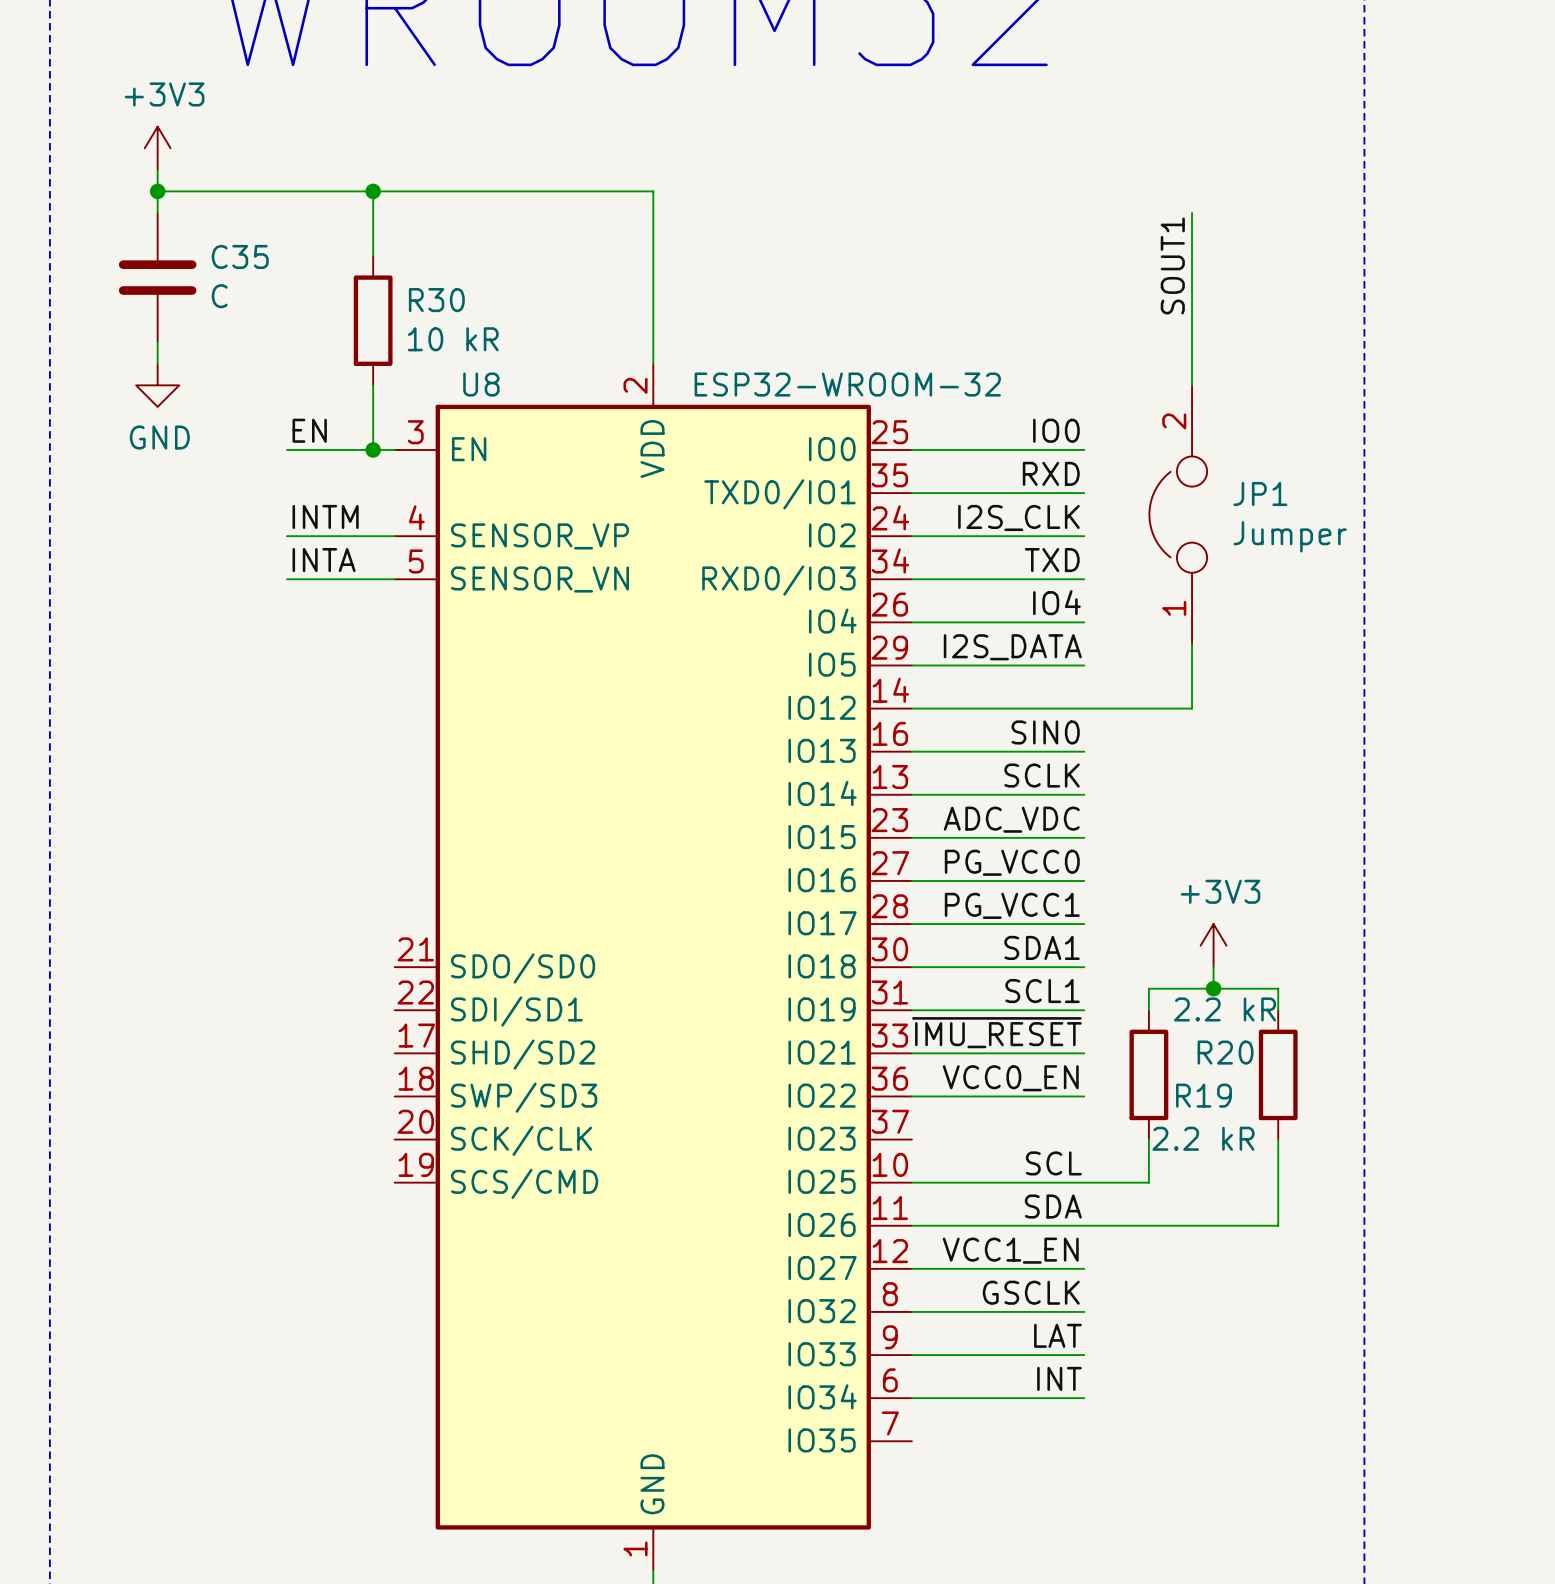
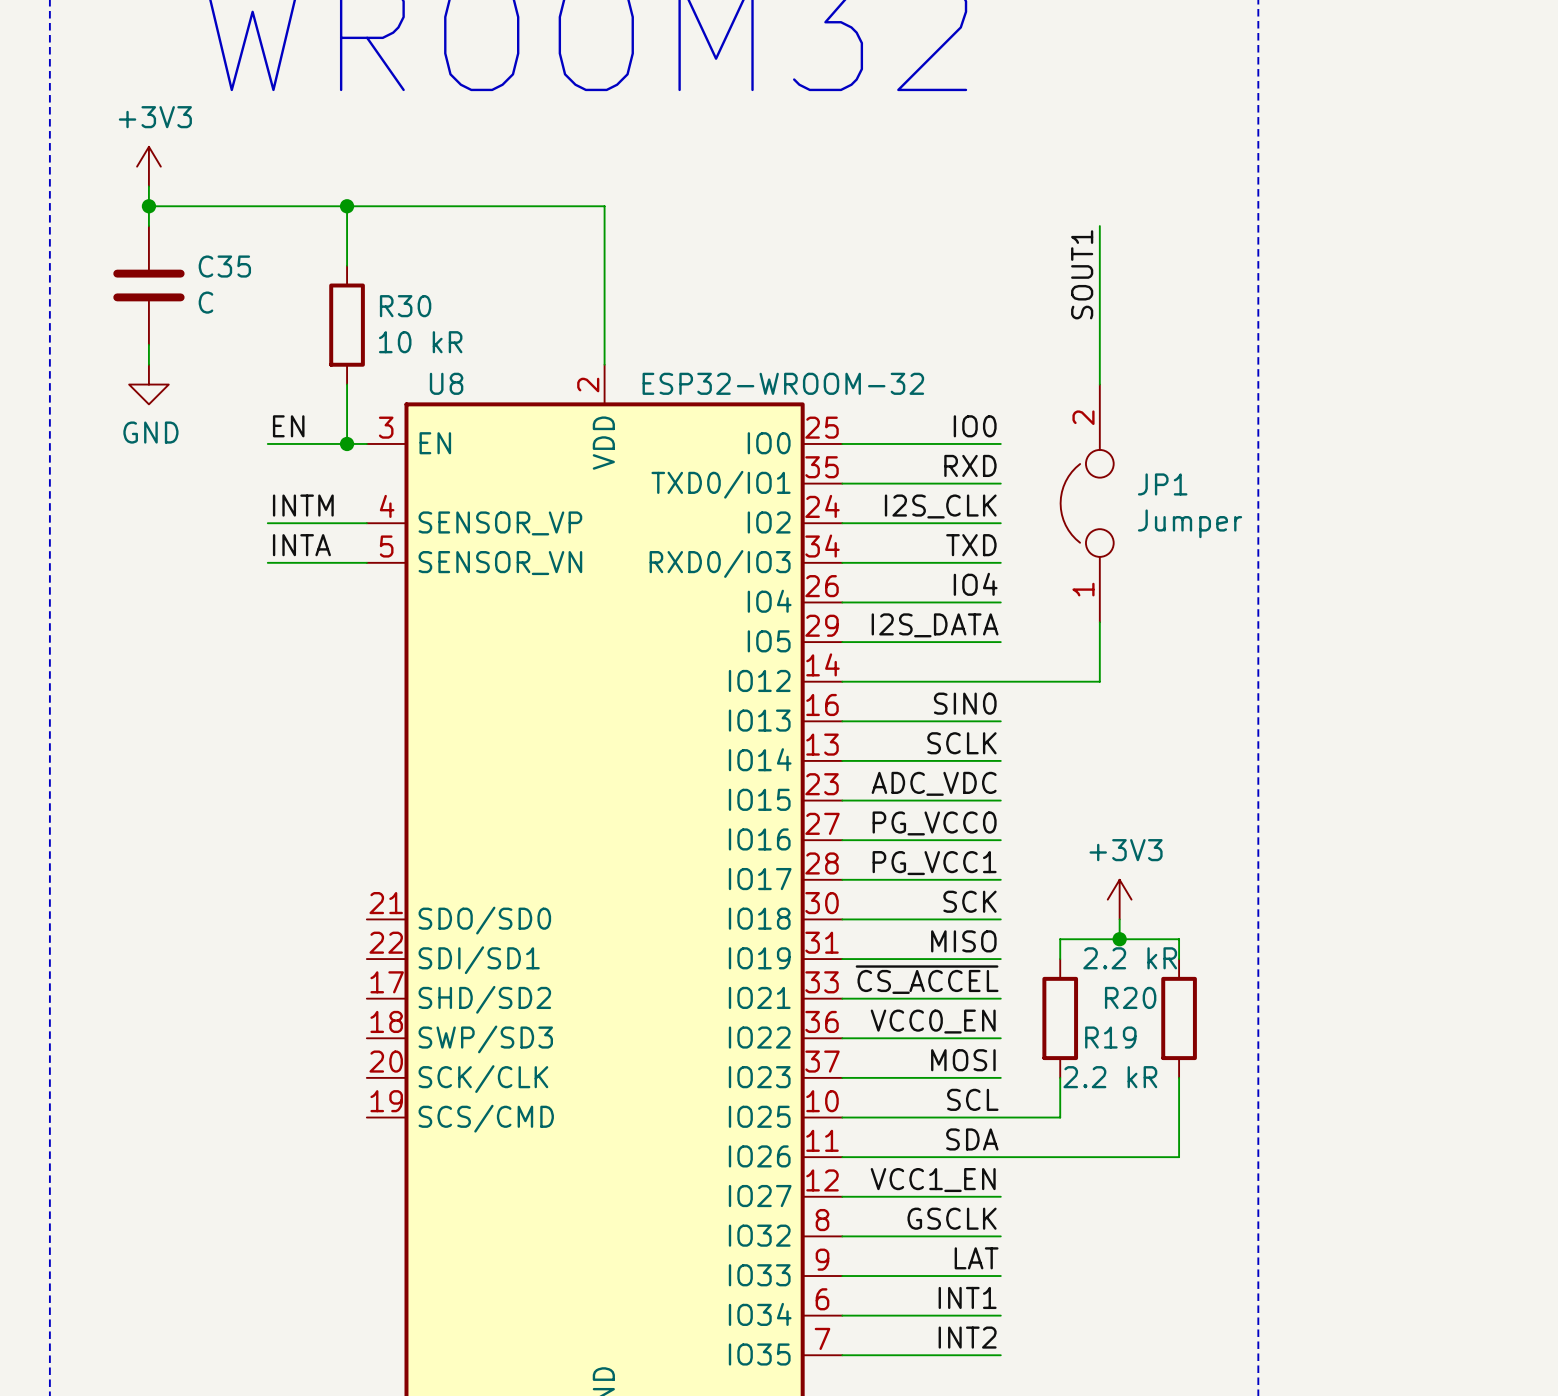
label: SDA1 (1042, 947) -> SCK (969, 901)
label: SCL1 (1042, 991) -> MISO (963, 941)
label: ~{IMU_RESET} (996, 1032) -> ~{CS_ACCEL} (927, 979)
label: none -> MOSI (963, 1060)
wire: none -> (842, 1077) (1000, 1077)
label: INT (1059, 1378) -> INT1 (967, 1297)
label: none -> INT2 (967, 1337)
wire: none -> (842, 1355) (1000, 1355)

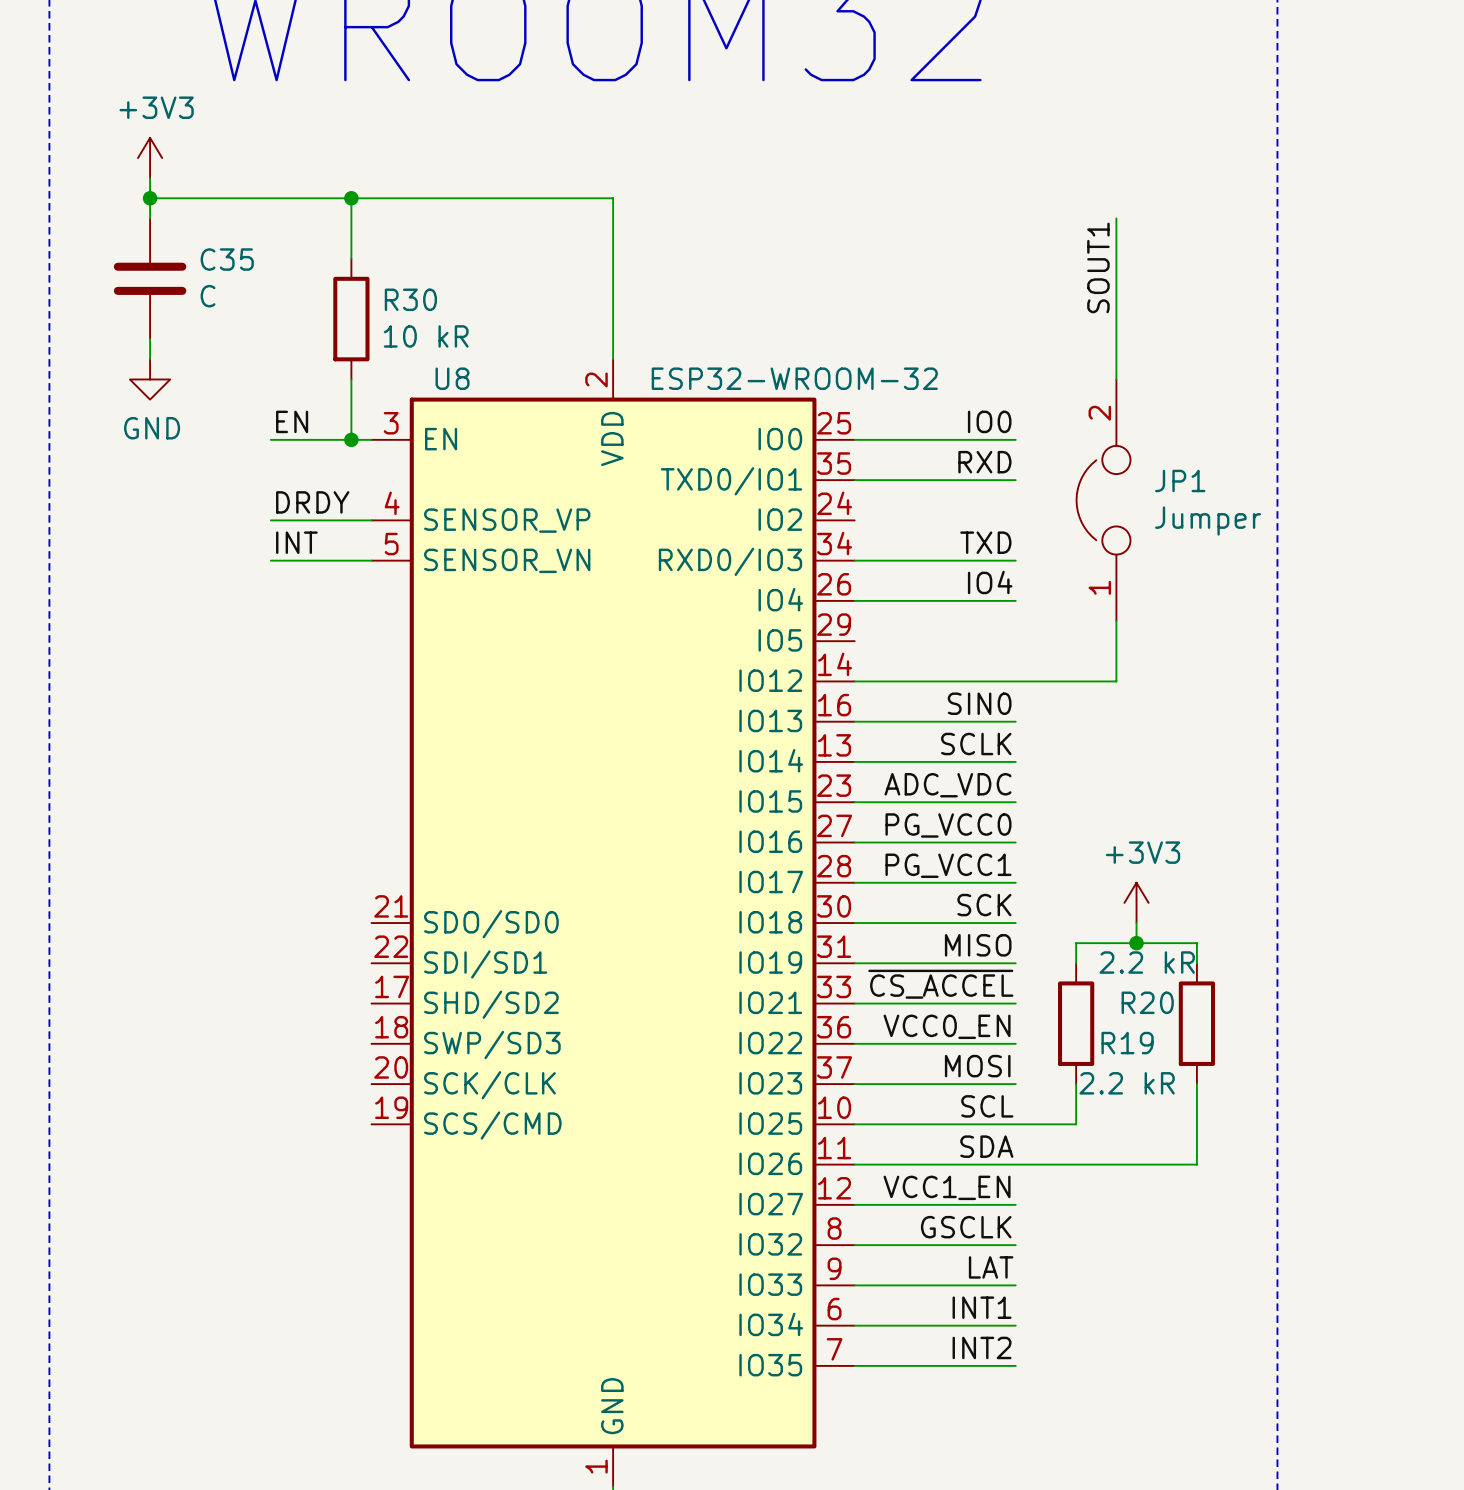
label: INTM (303, 505) -> DRDY (312, 502)
label: I2S_CLK (940, 506) -> none
wire: (842, 523) (1000, 523) -> none
label: INTA (301, 545) -> INT (296, 542)
label: I2S_DATA (935, 625) -> none
wire: (842, 642) (1000, 642) -> none

